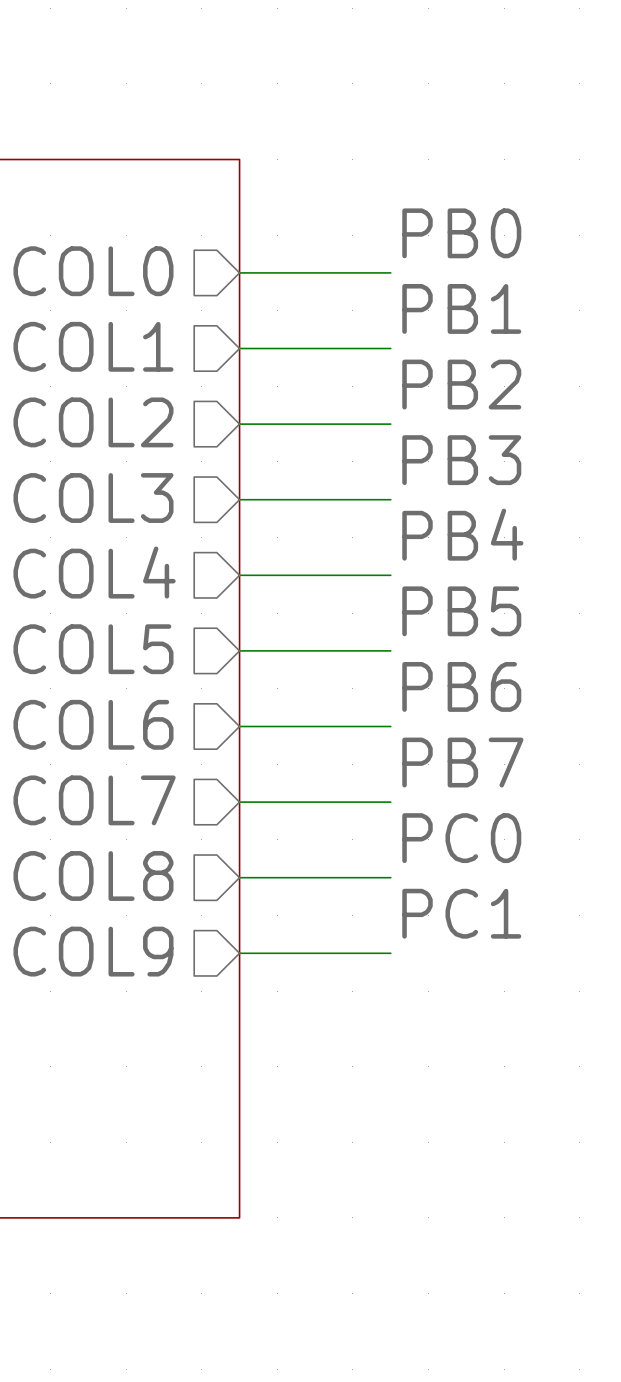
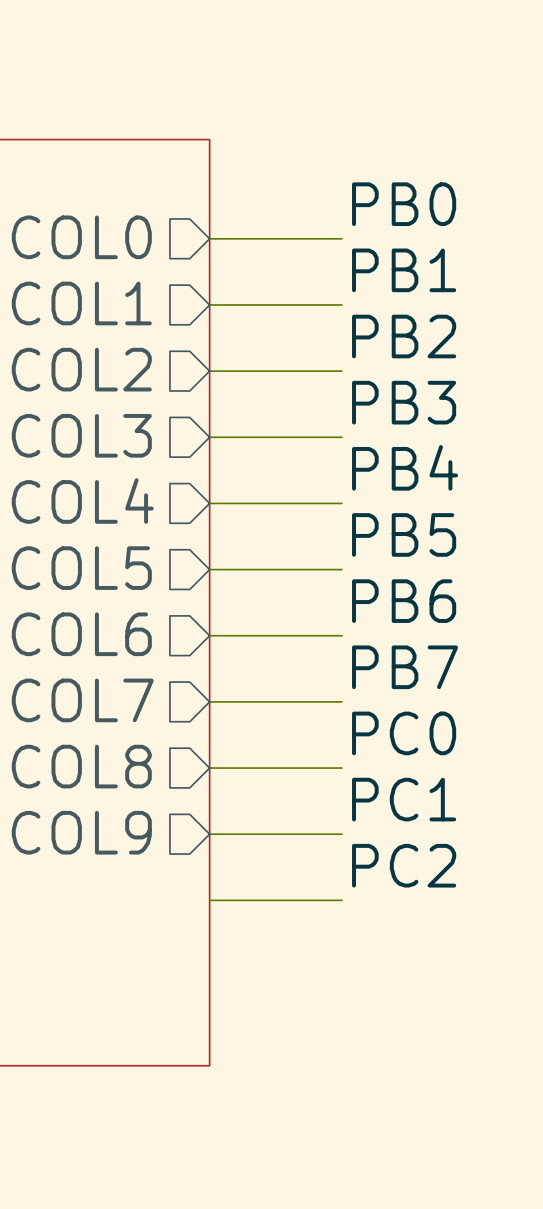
label: none -> PC2 (404, 865)
wire: none -> (209, 900) (341, 900)

